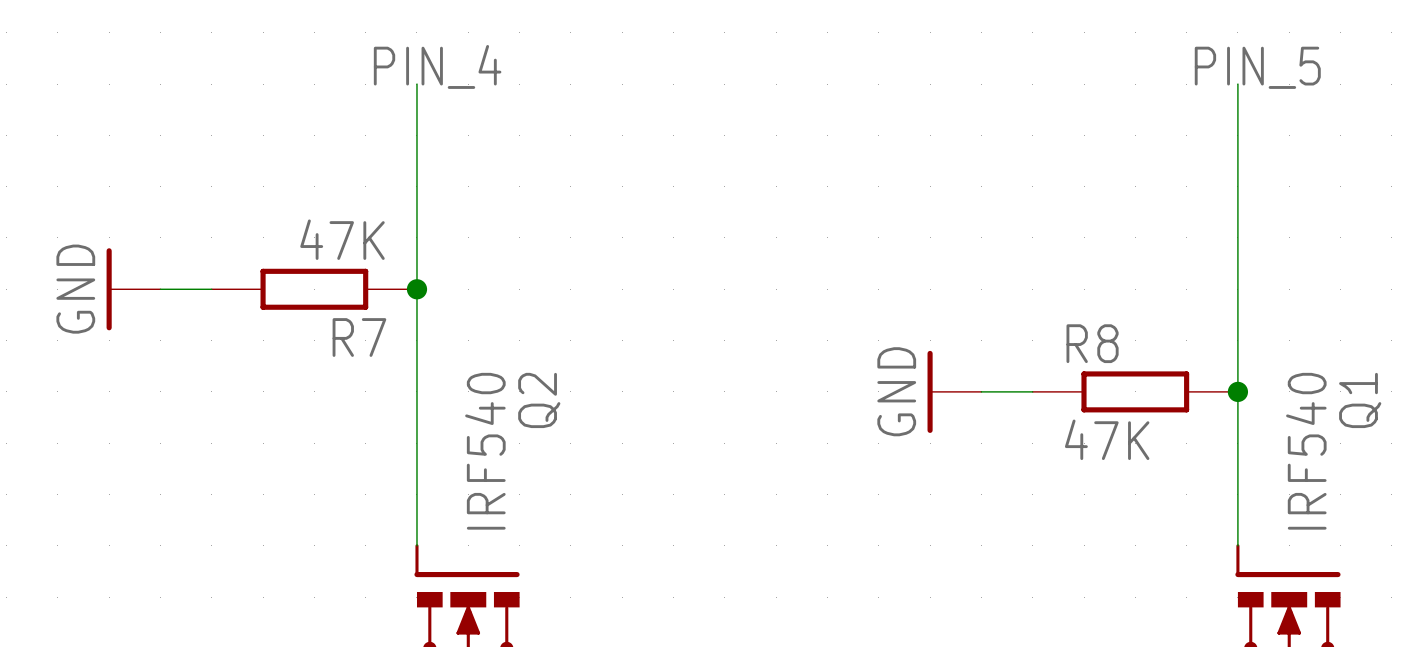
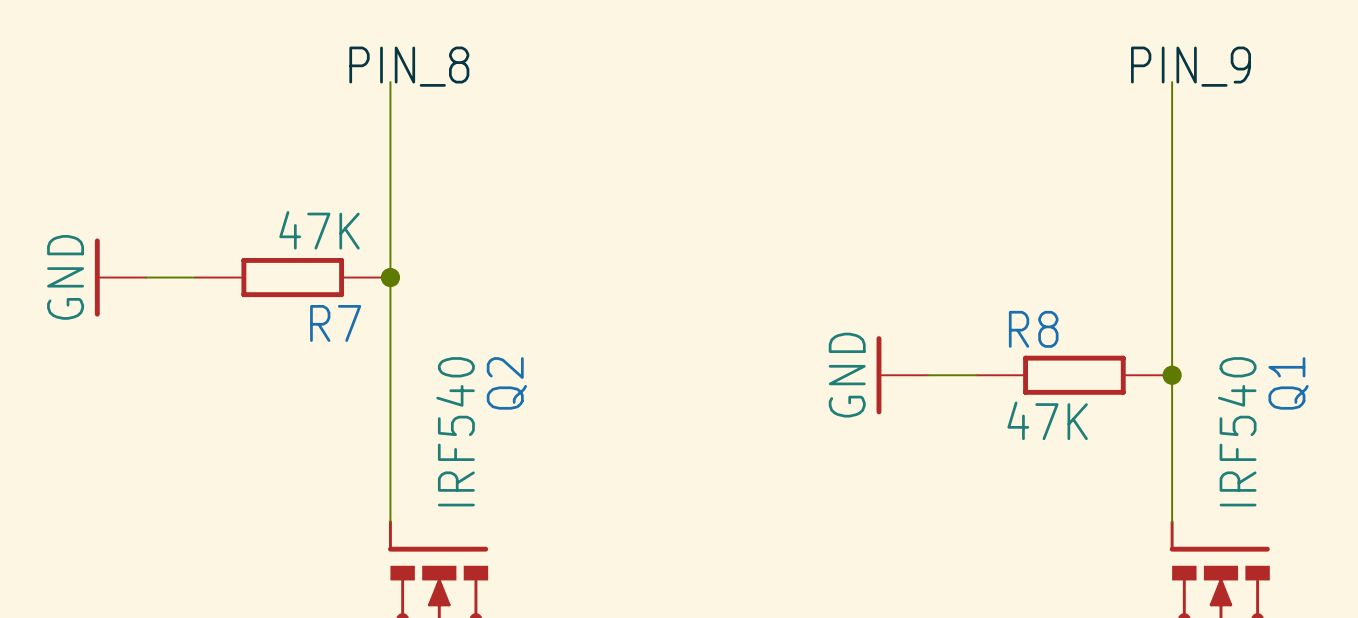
label: PIN_4 (437, 66) -> PIN_8 (409, 66)
label: PIN_5 (1257, 67) -> PIN_9 (1191, 66)

